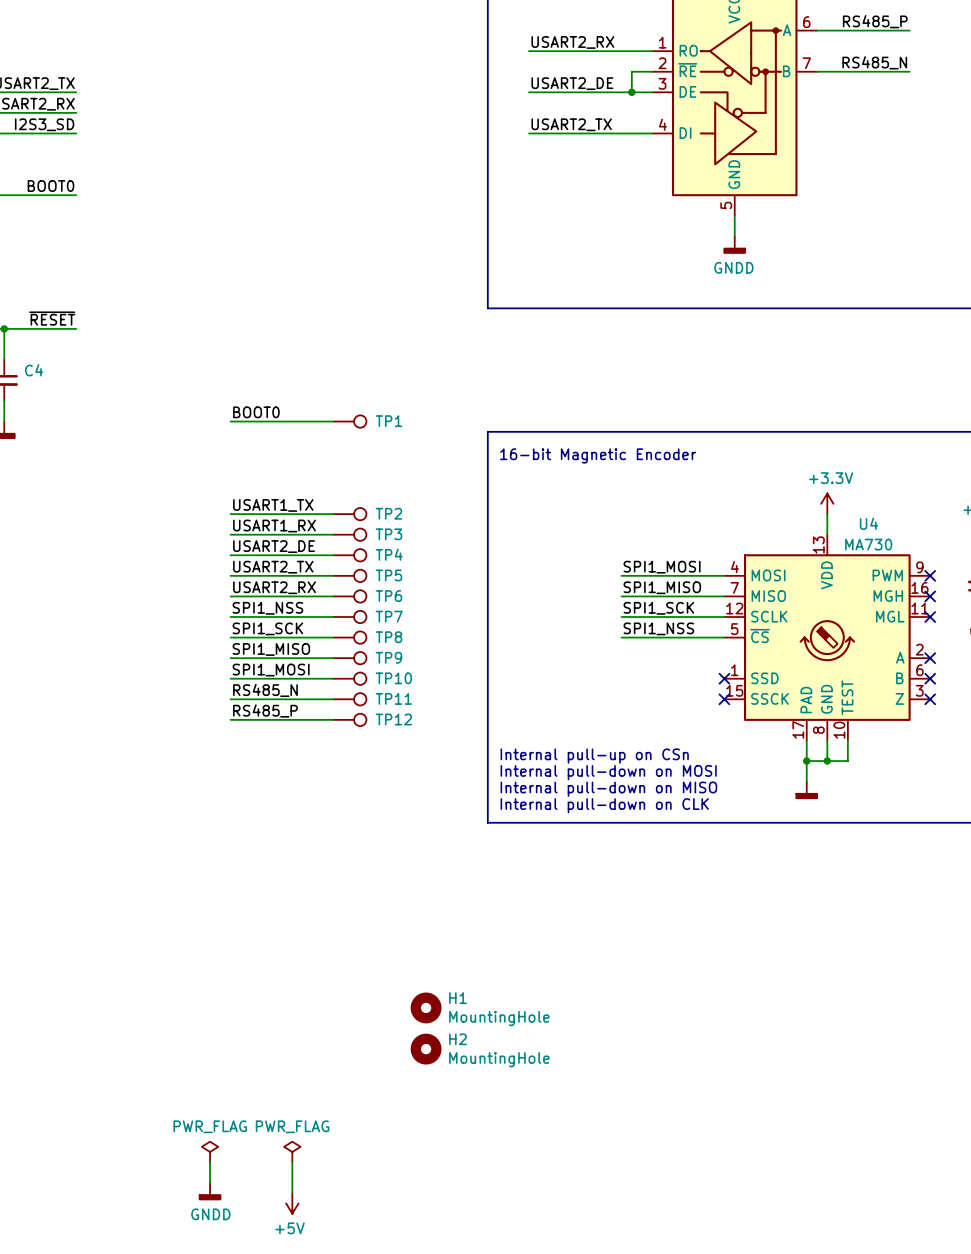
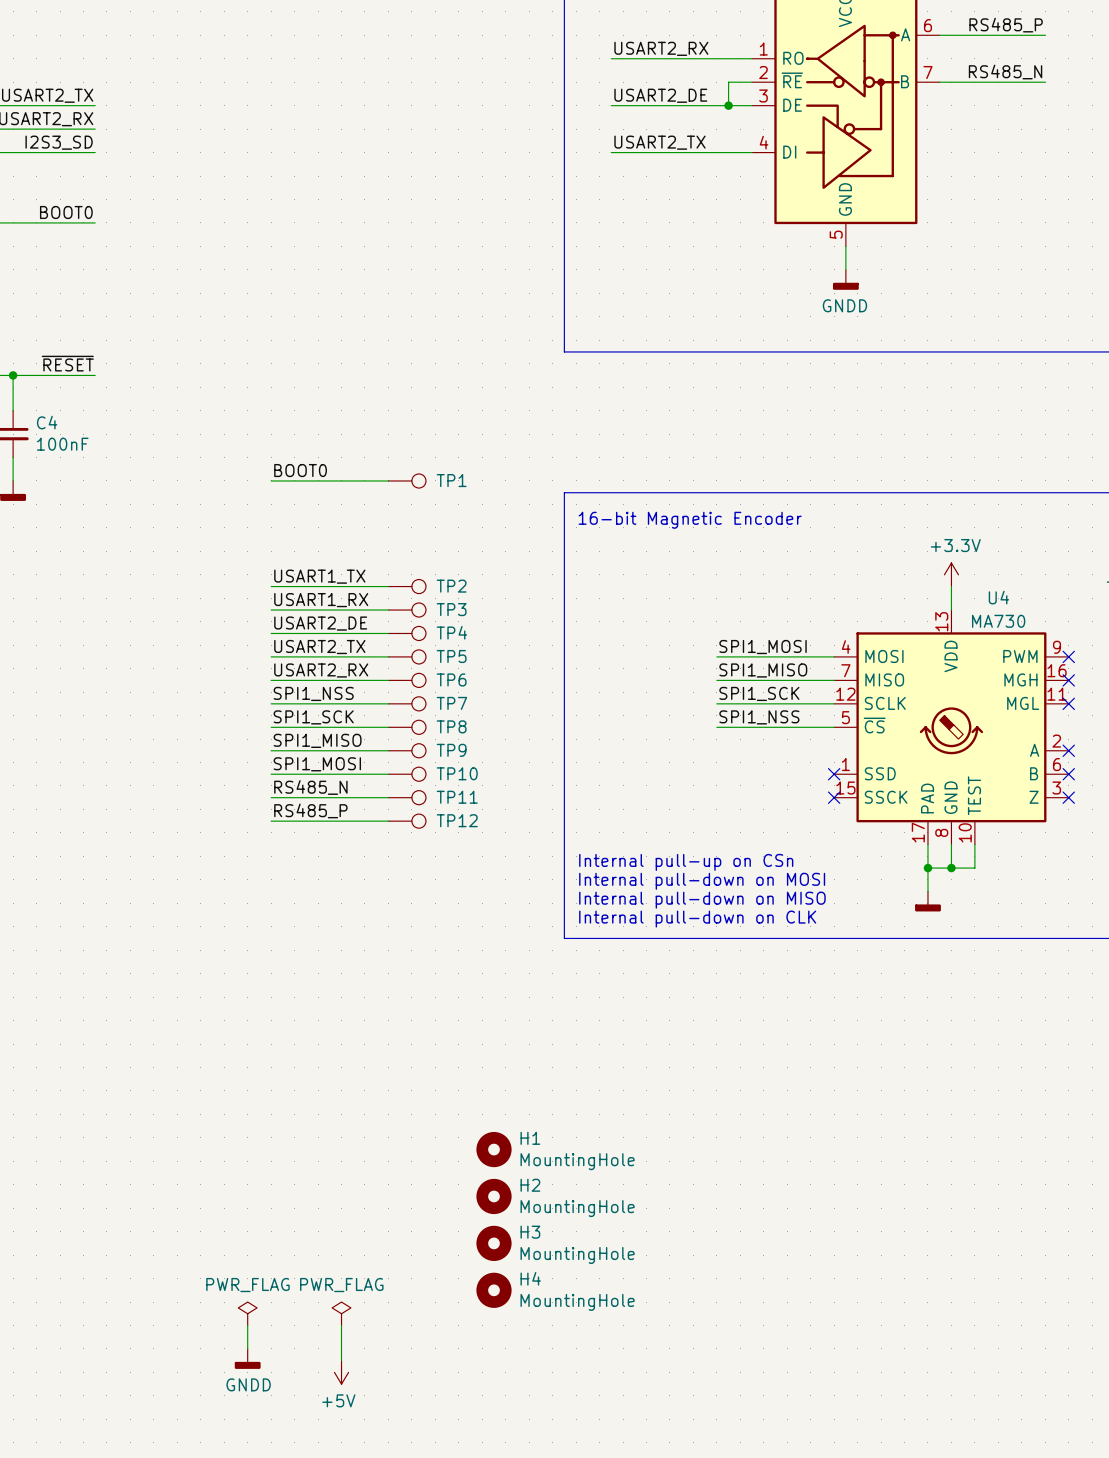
C4 value: none -> 100nF (62, 444)
H3: none -> MountingHole (494, 1243)
H4: none -> MountingHole (494, 1290)

